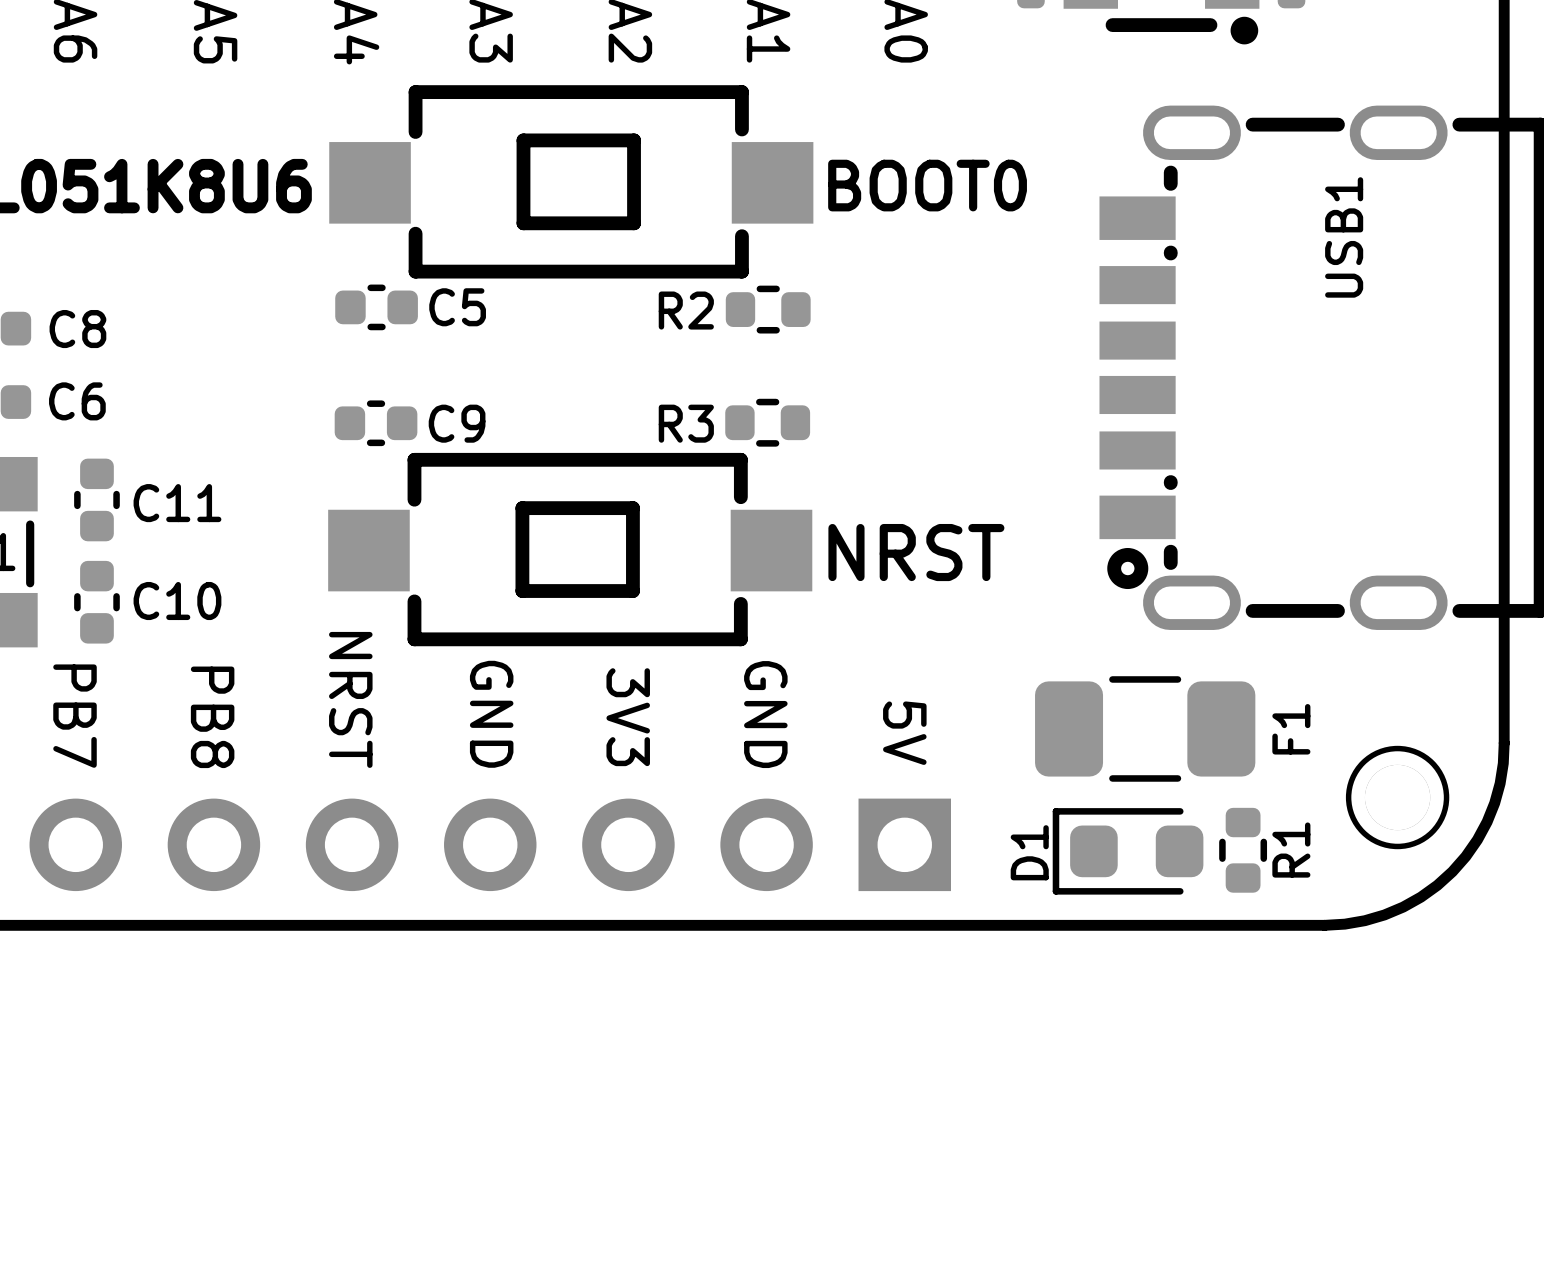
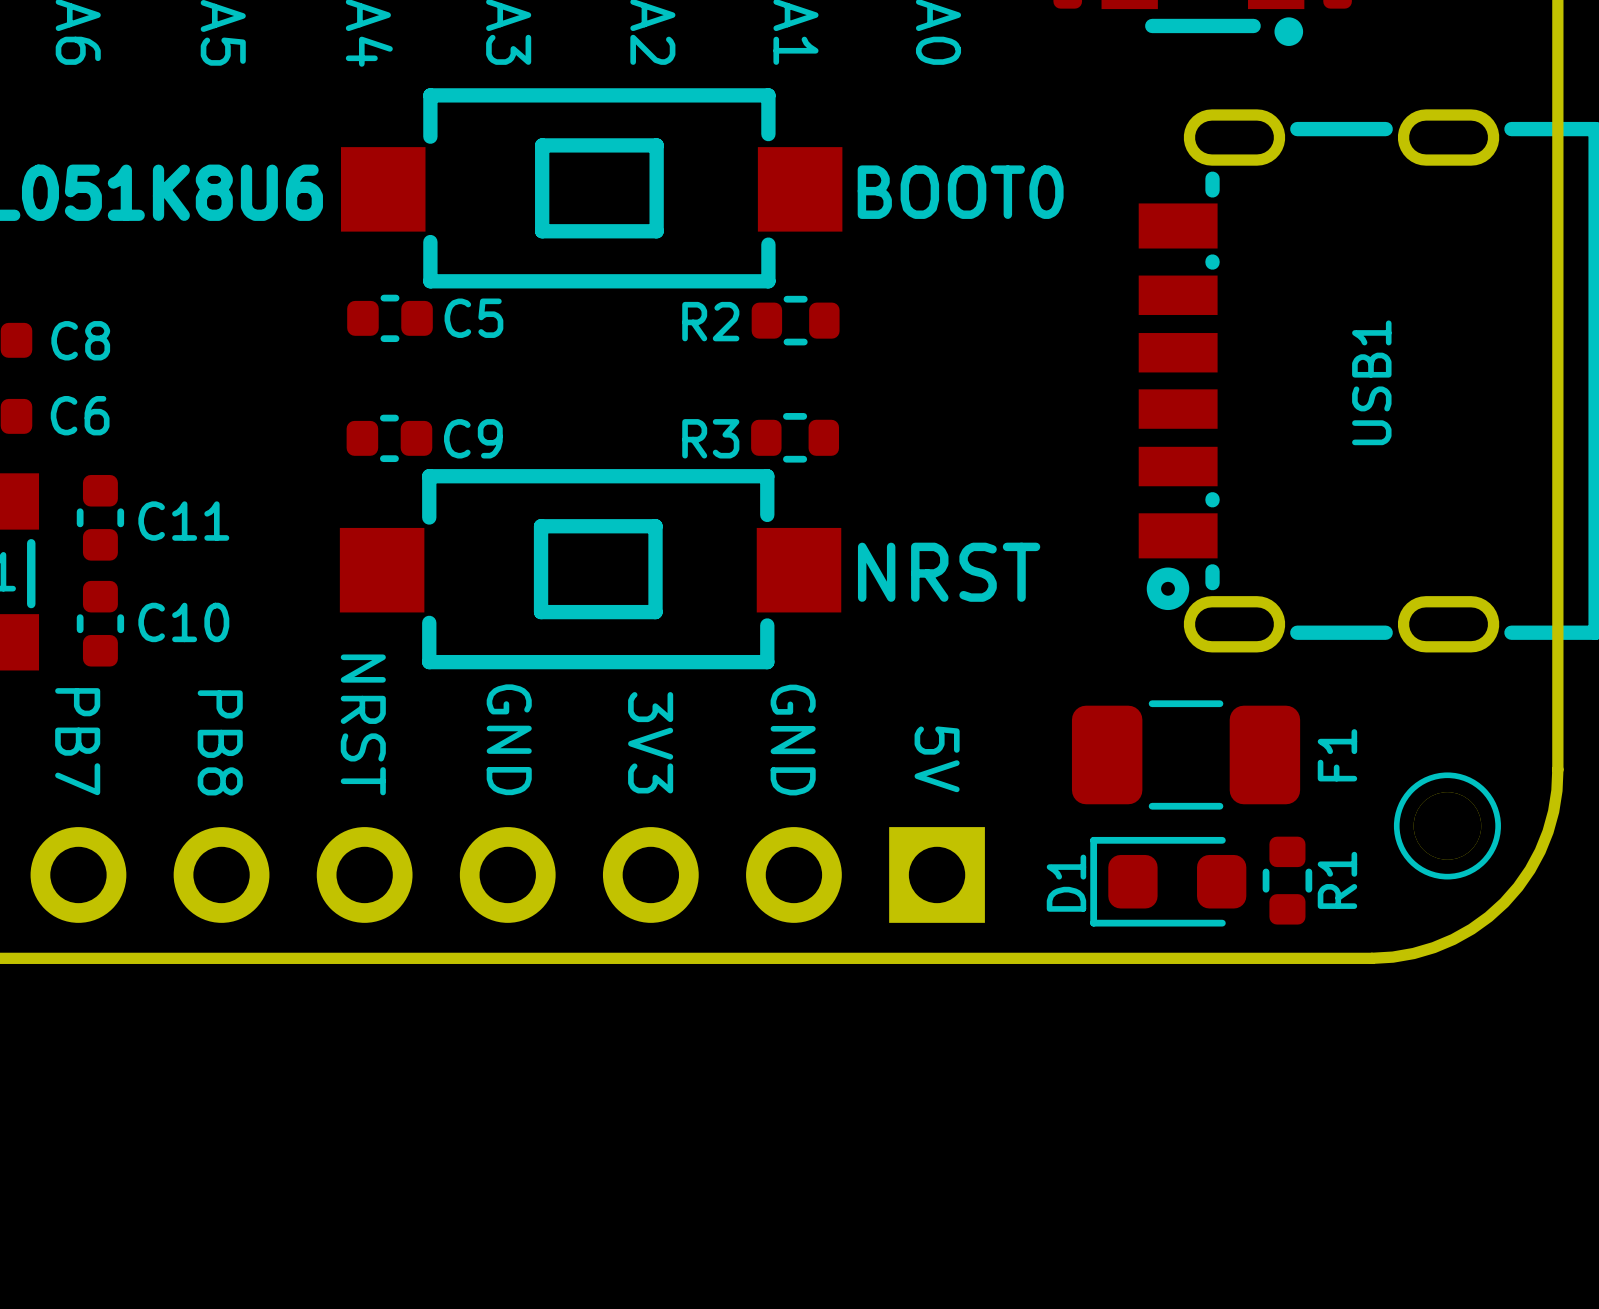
USB1 name position: USB1 (1344, 237) -> USB1 (1371, 382)

